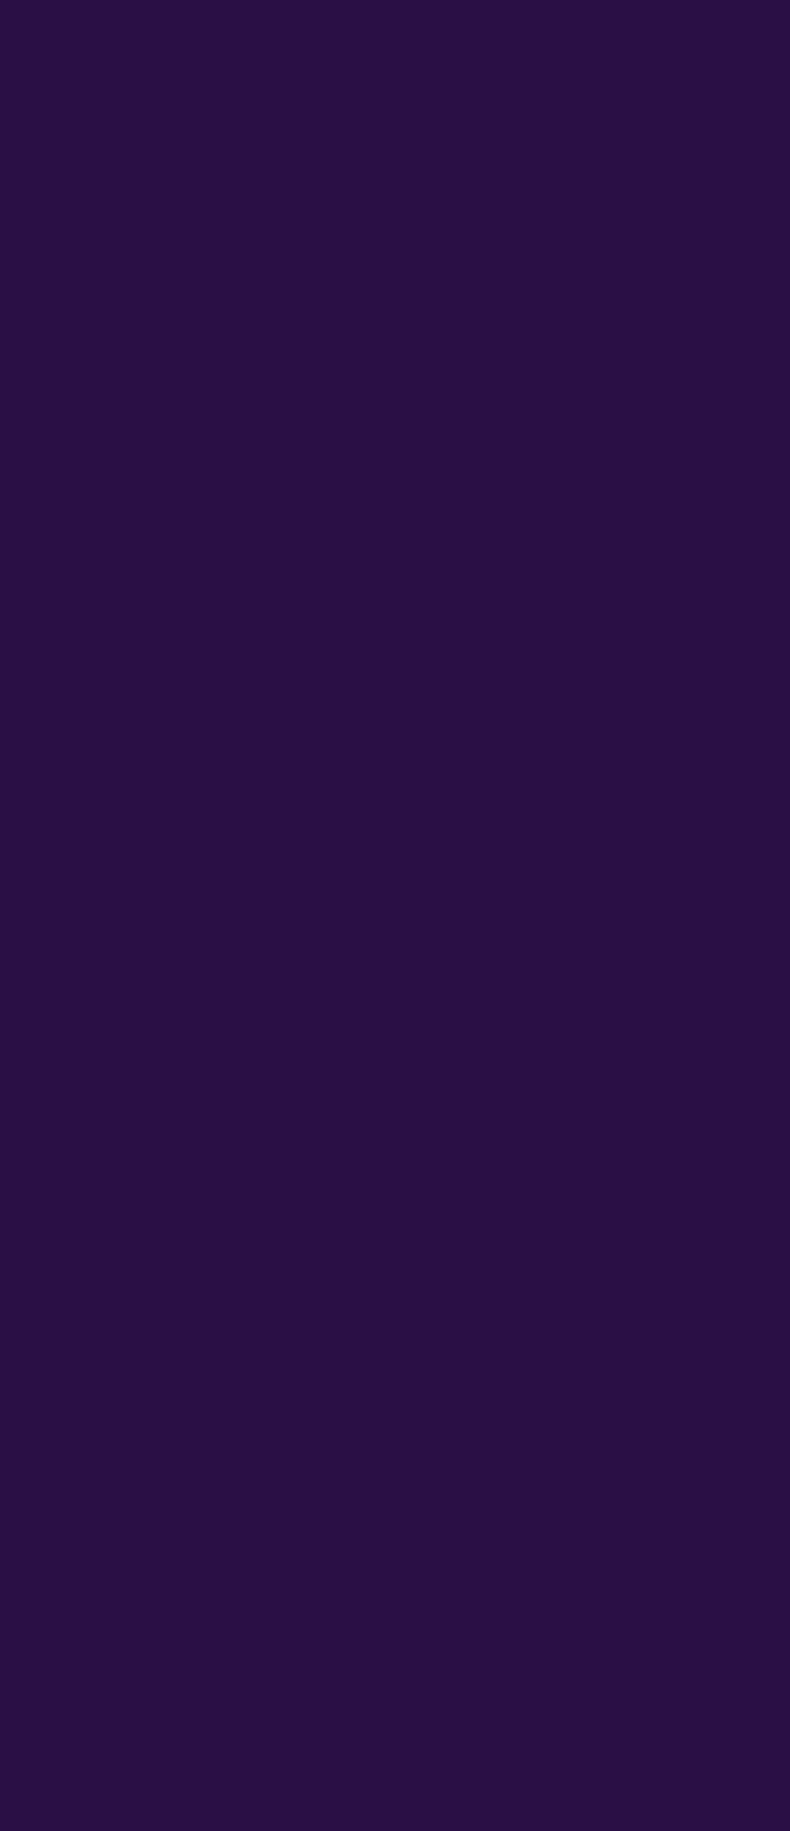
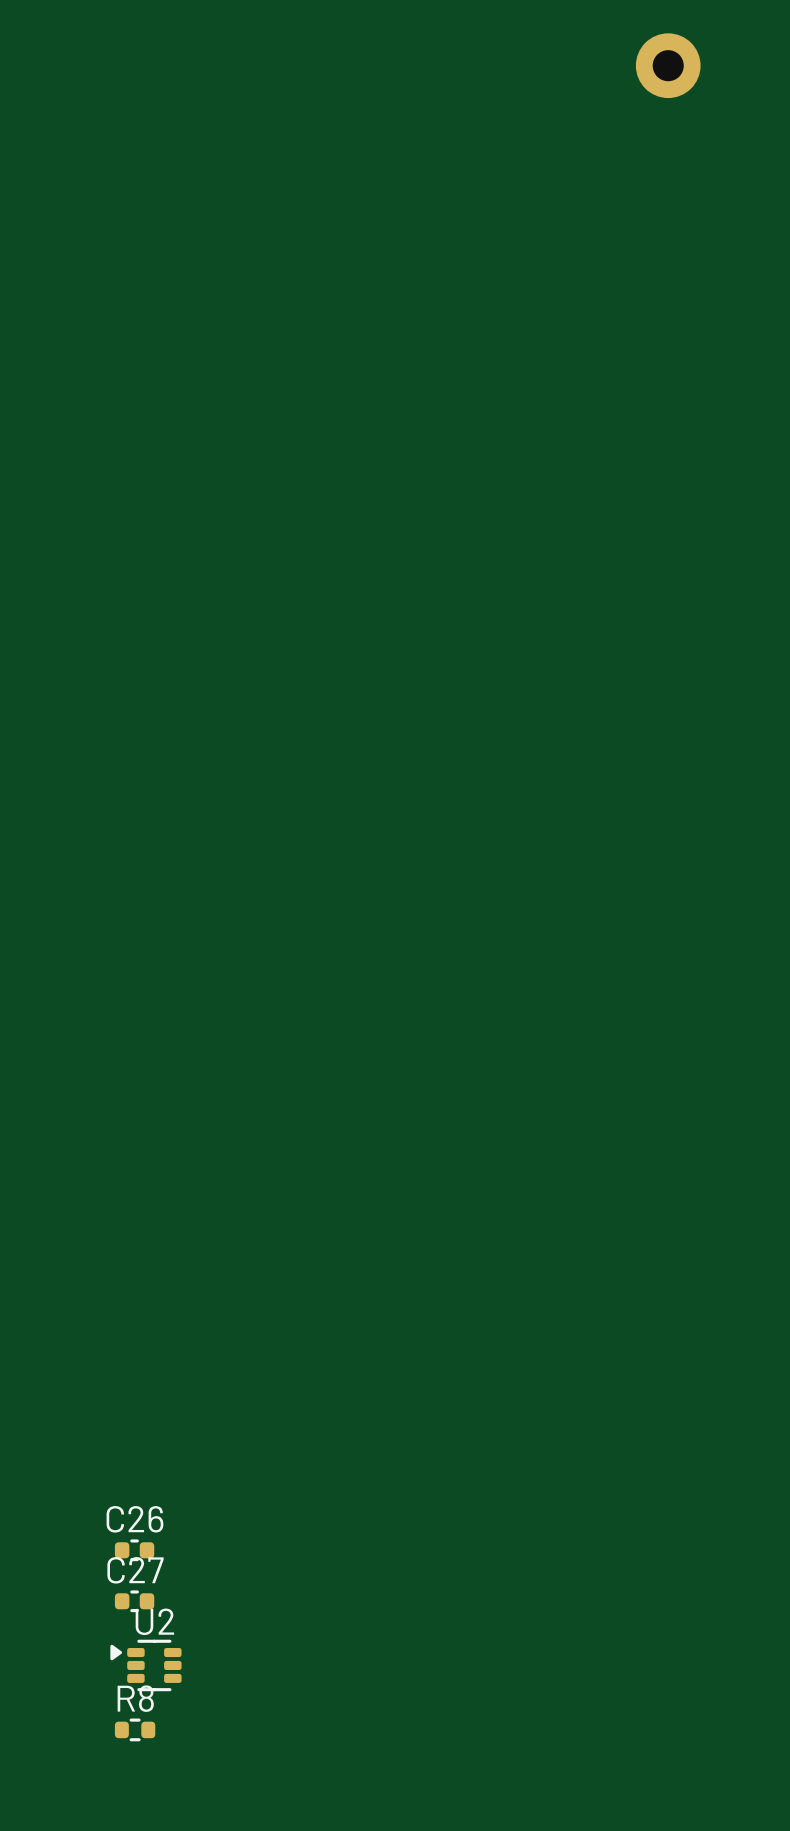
part: none -> (668, 65)
C26: none -> (134, 1550)
C27: none -> (134, 1601)
U2: none -> (145, 1665)
R8: none -> (135, 1729)

